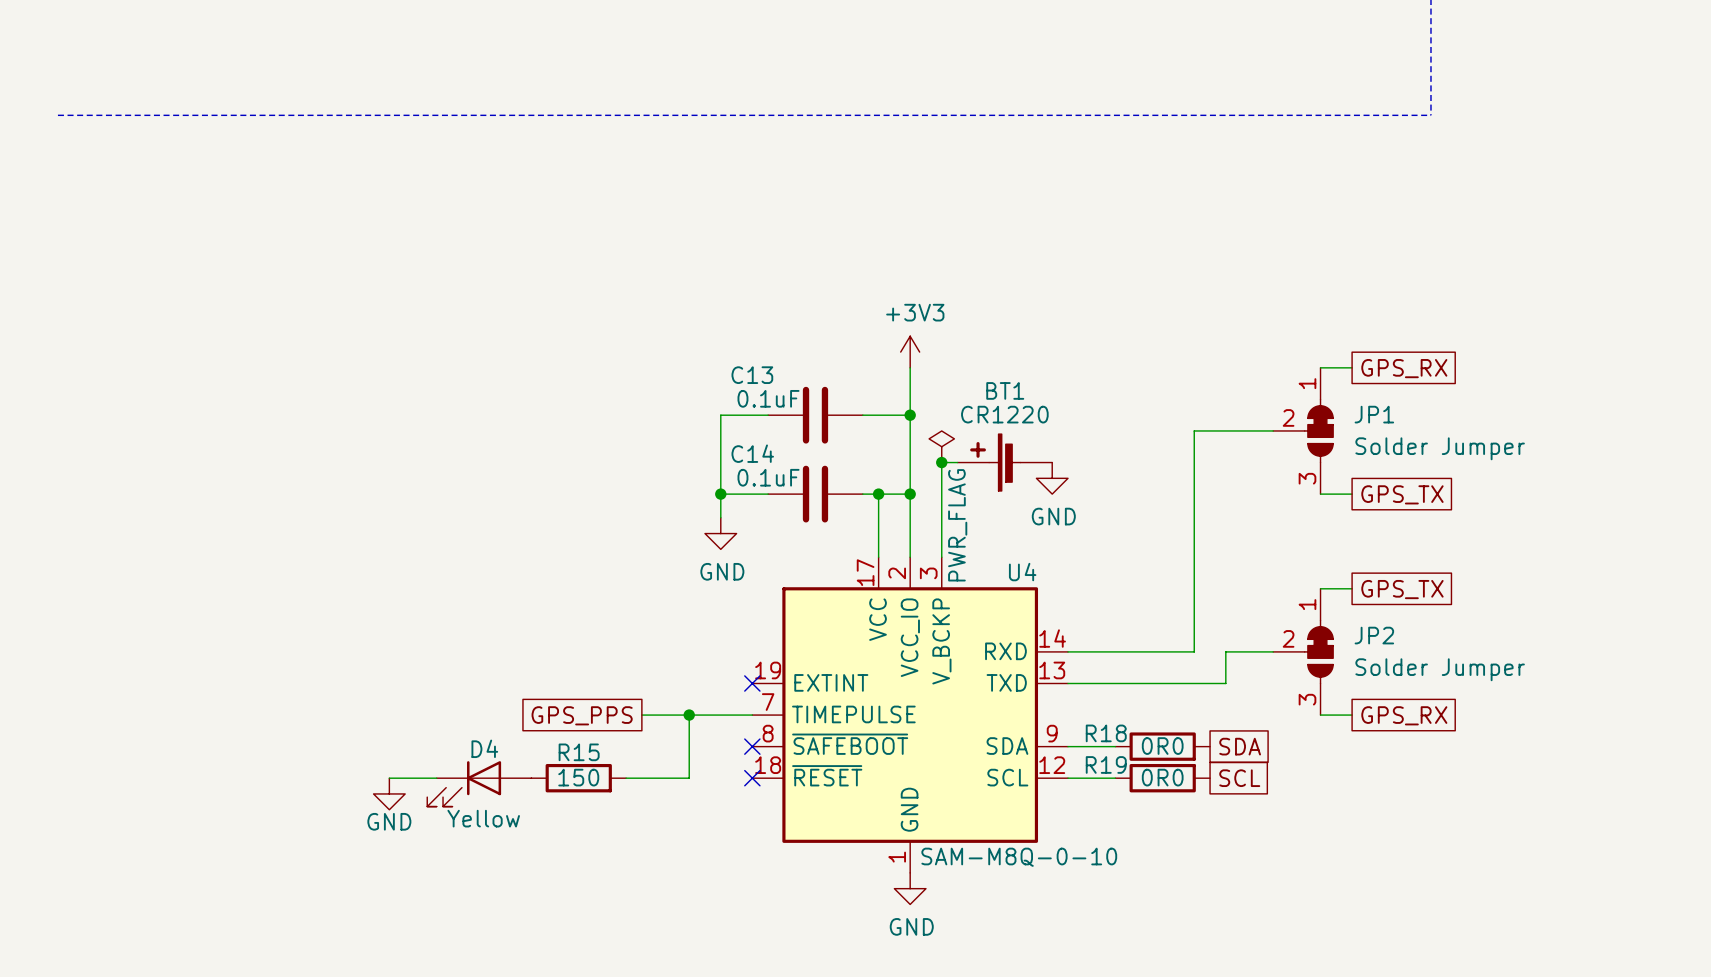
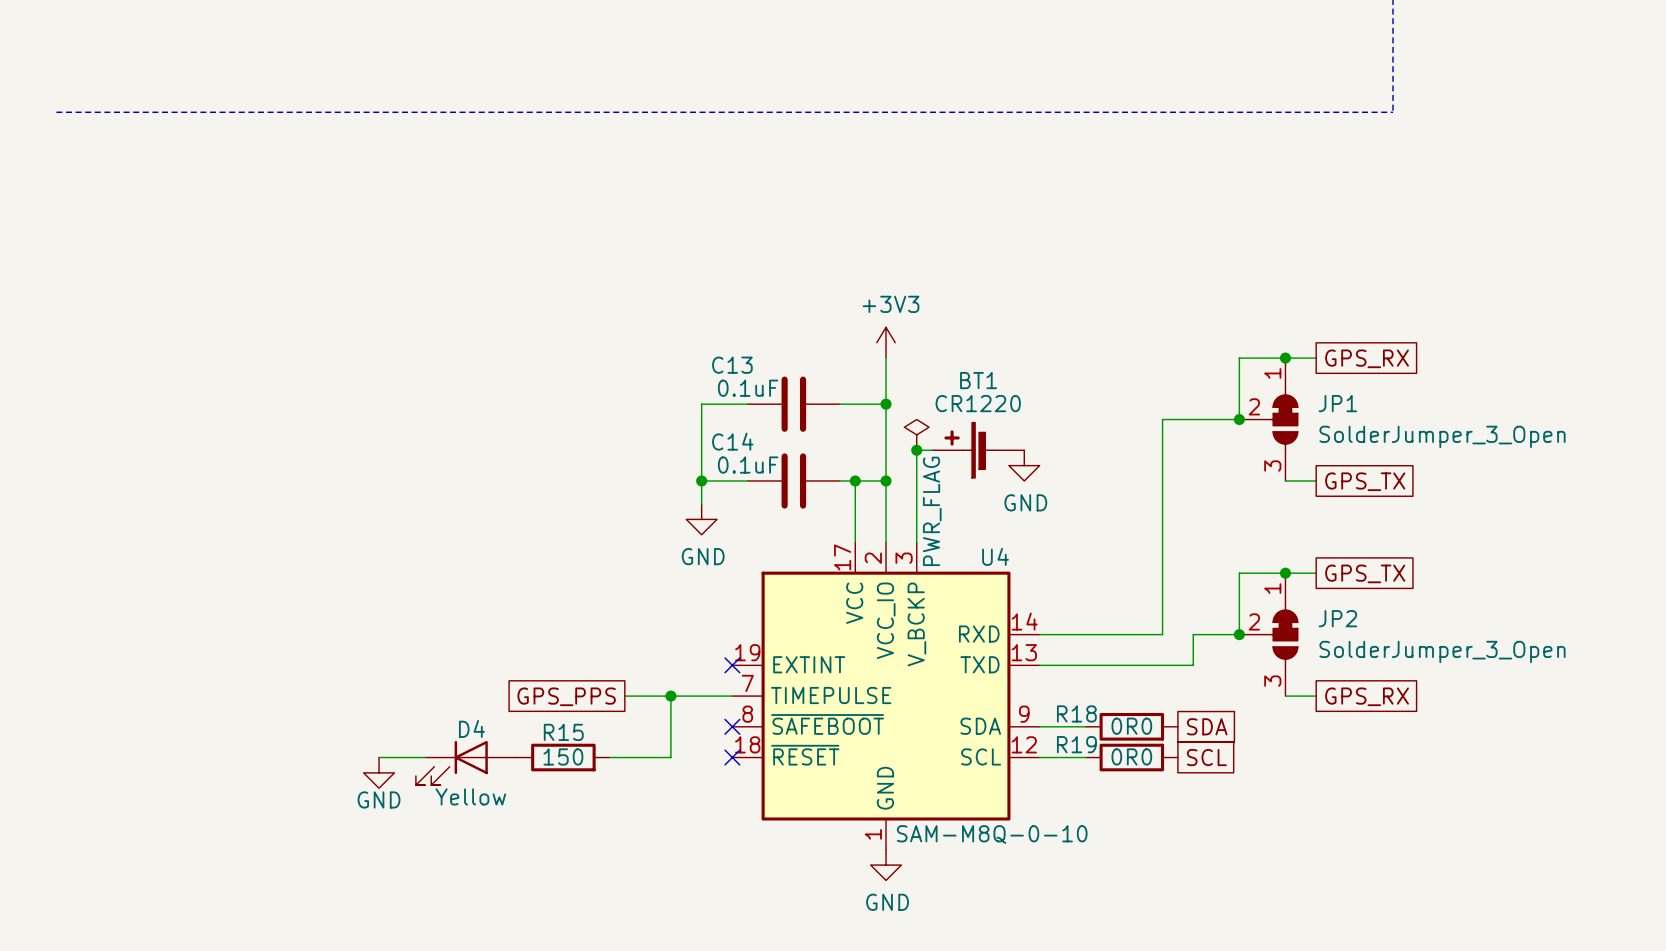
wire: none -> (1285, 358) (1239, 358) (1239, 419)
junction: none -> (1285, 358)
junction: none -> (1239, 419)
JP1 text: Solder Jumper (1440, 448) -> none
JP1 value: none -> SolderJumper_3_Open (1442, 436)
wire: none -> (1285, 573) (1239, 573) (1239, 634)
junction: none -> (1285, 573)
junction: none -> (1239, 634)
JP2 text: Solder Jumper (1440, 669) -> none
JP2 value: none -> SolderJumper_3_Open (1442, 651)

